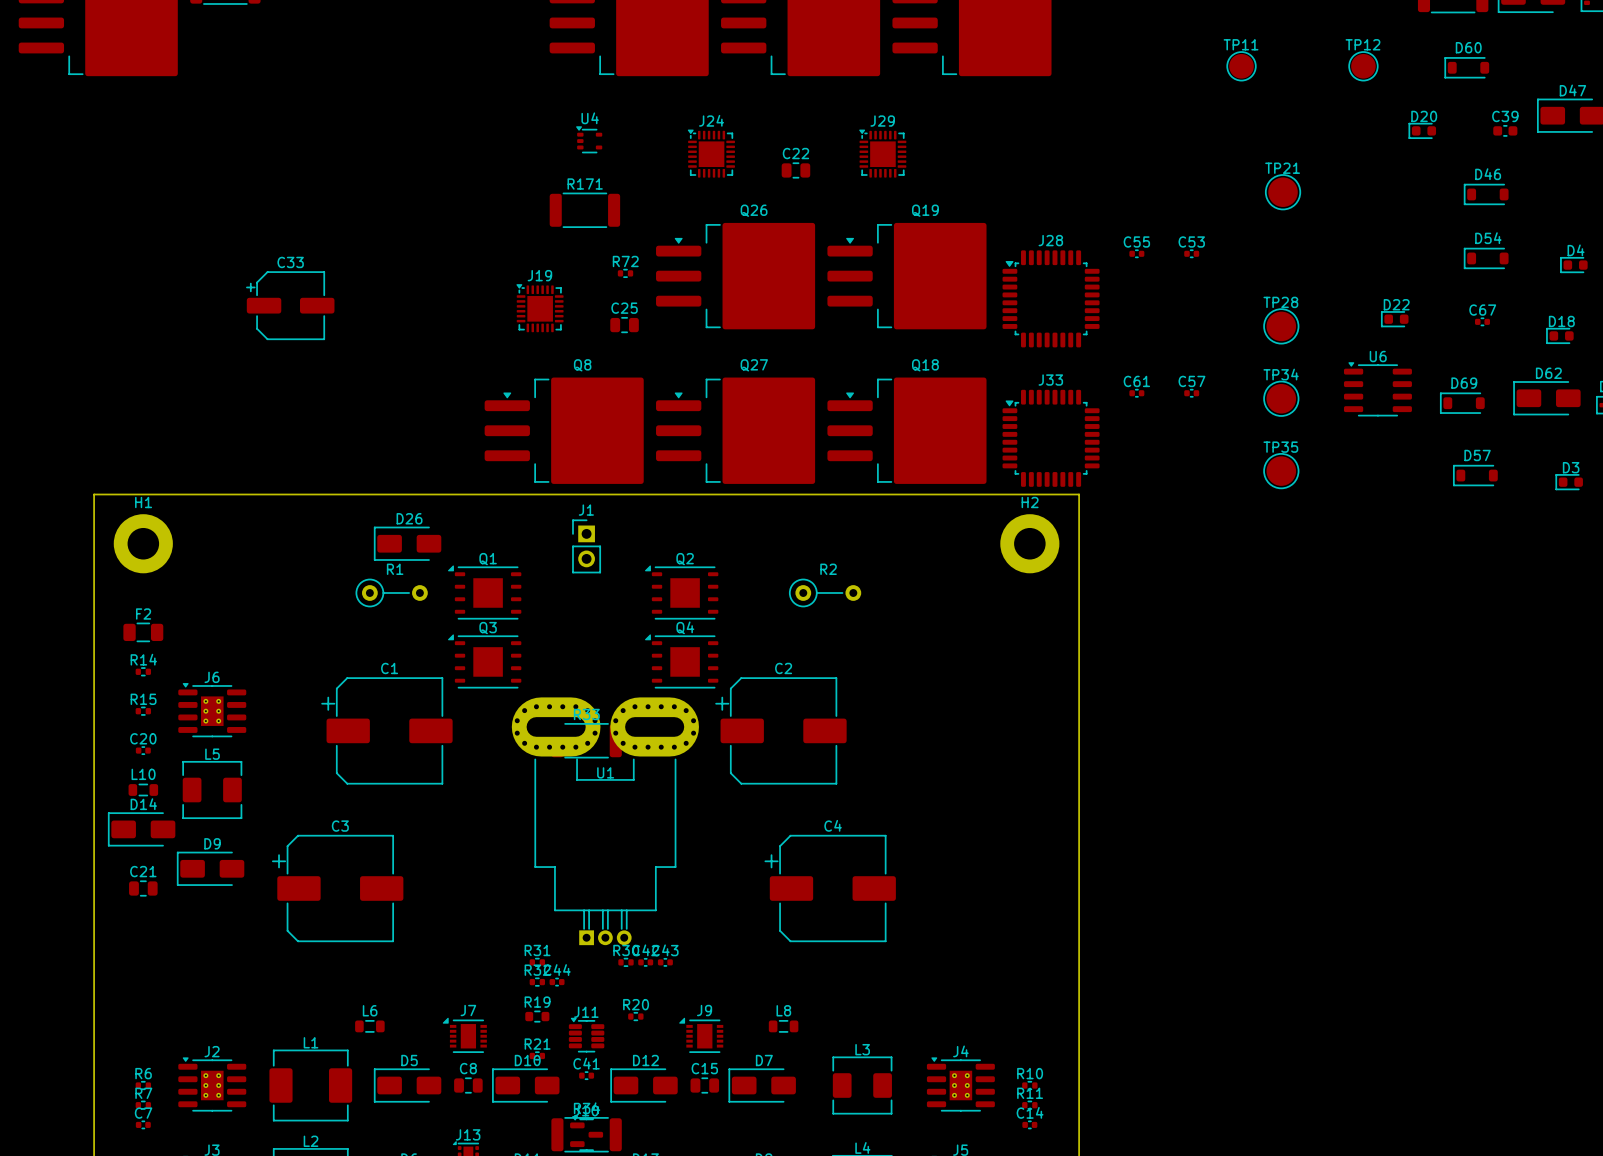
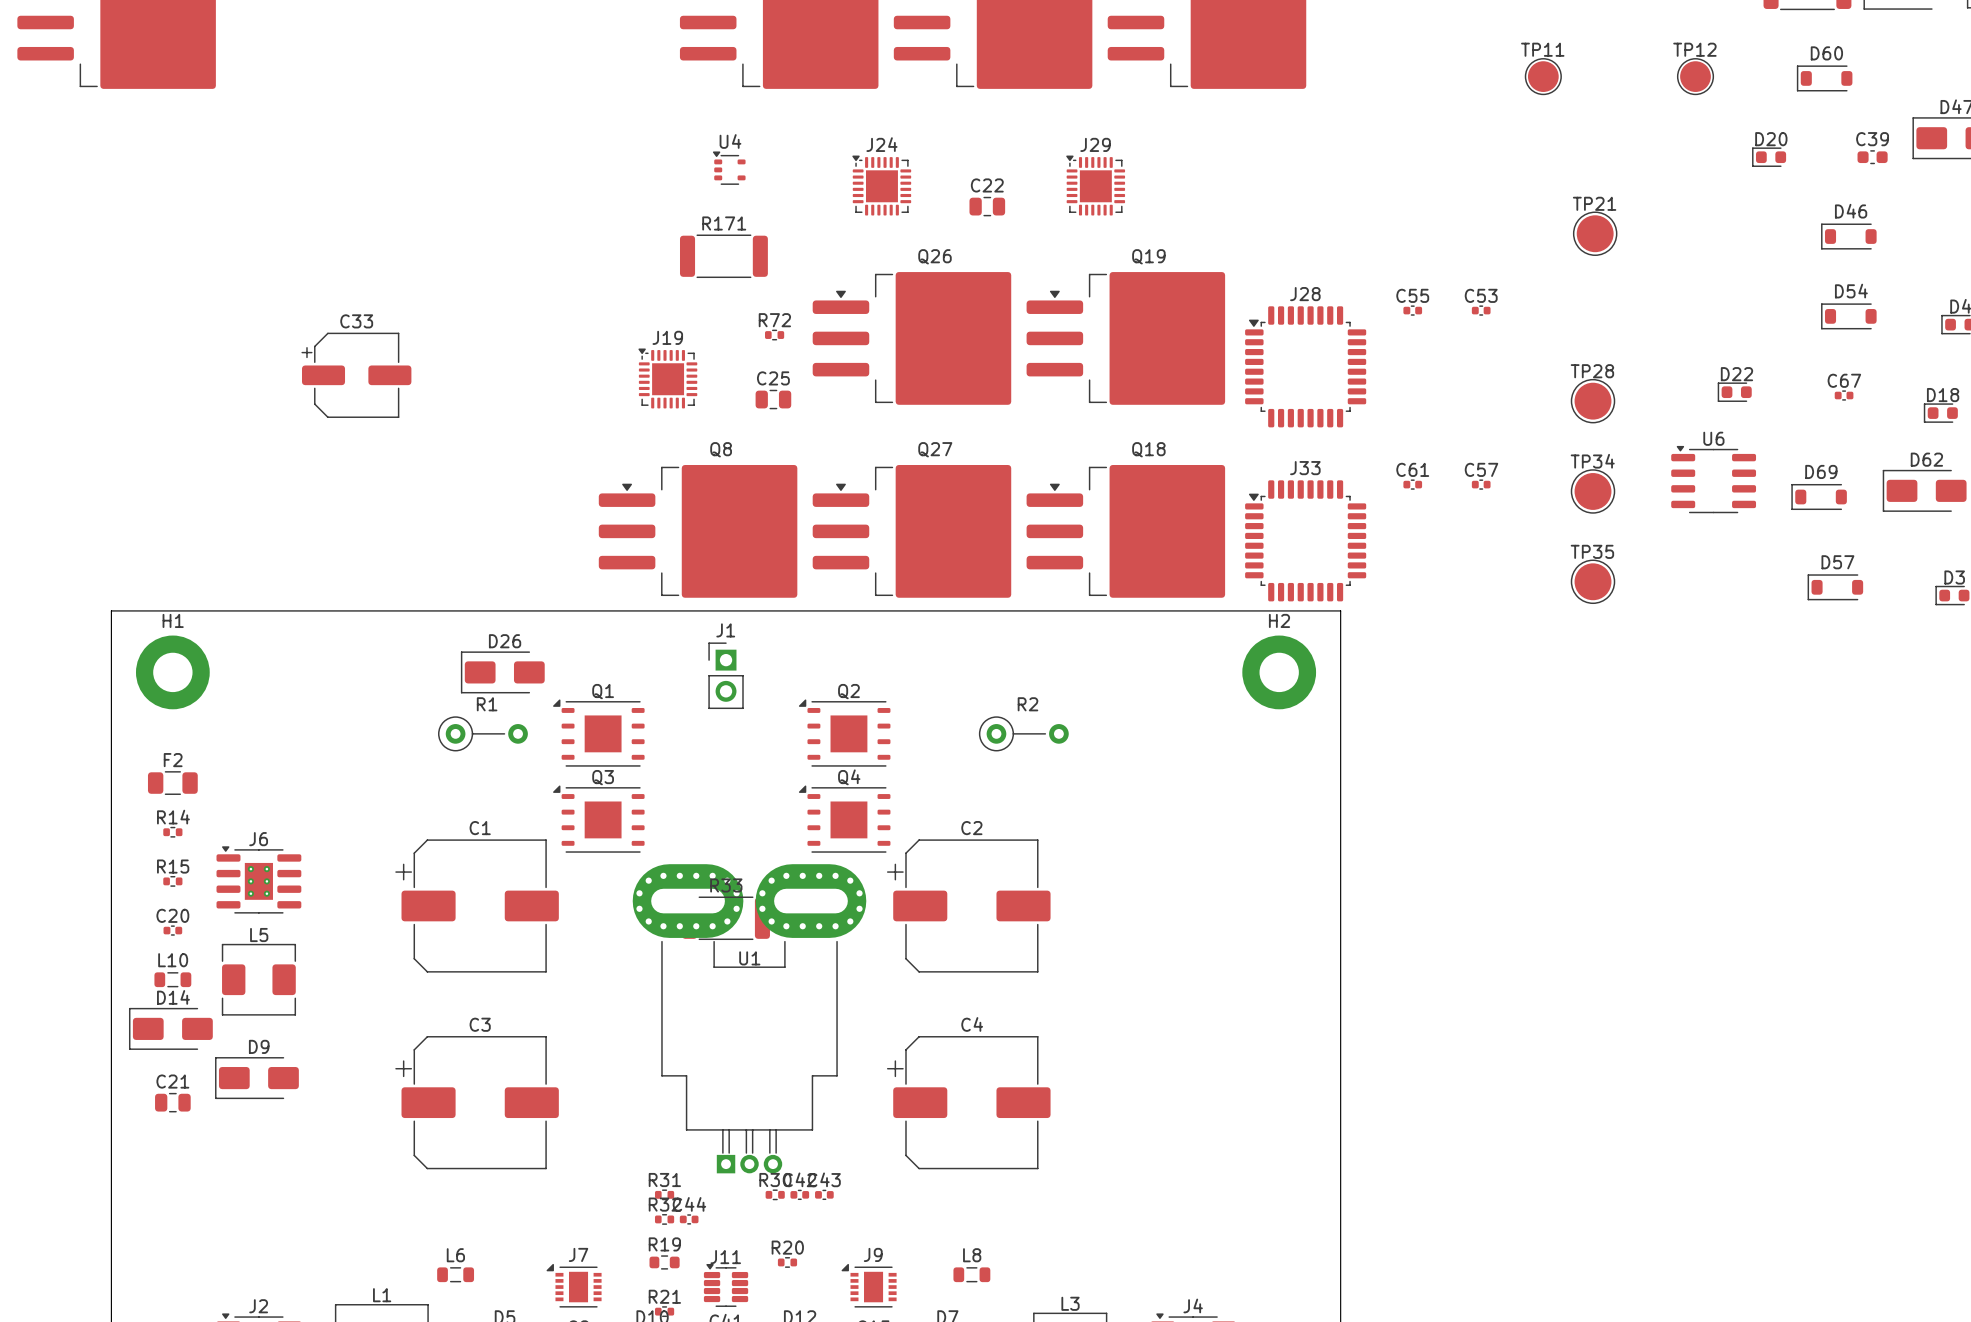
C3 position: (337, 888) -> (477, 1102)
C4 position: (830, 888) -> (968, 1102)

